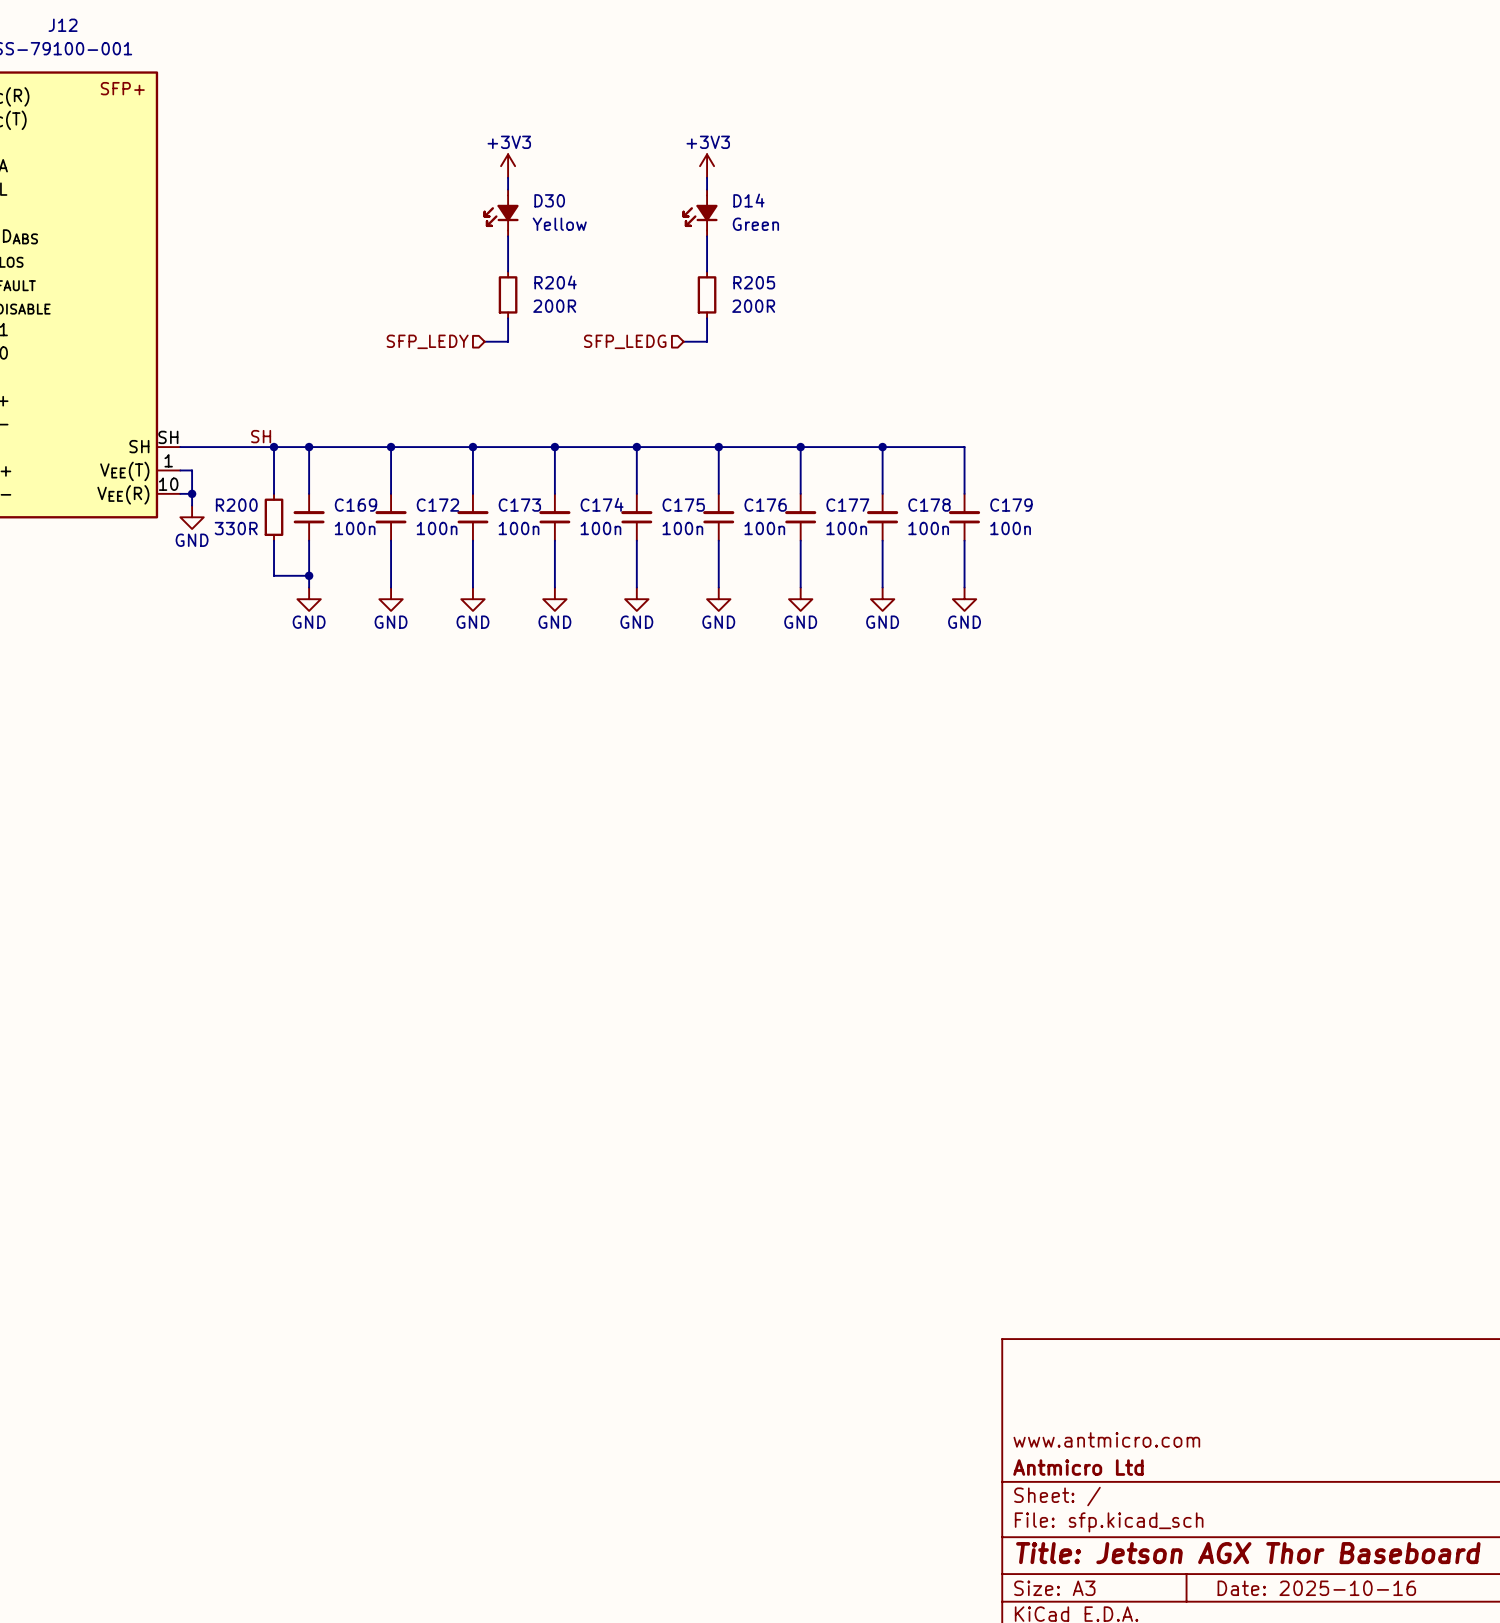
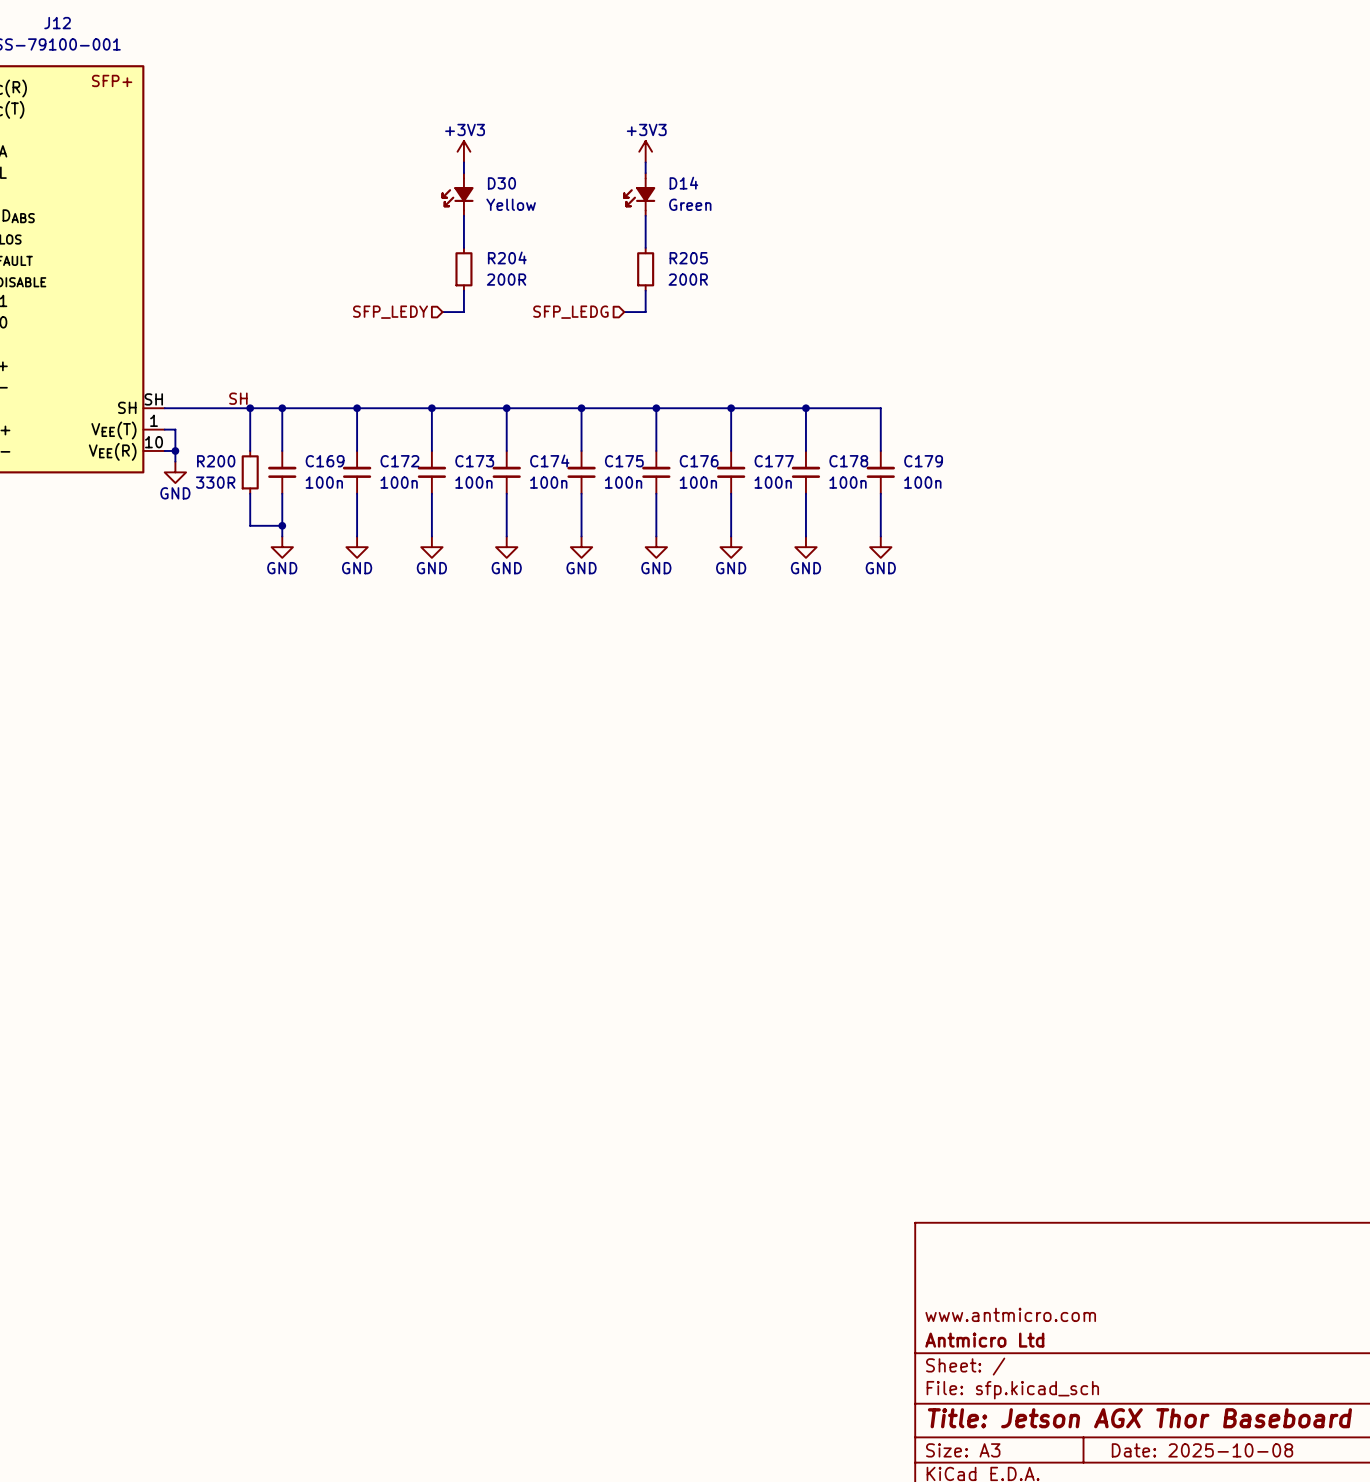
title block: Date: 2025-10-16 (1316, 1588) -> Date: 2025-10-08 (1202, 1450)

